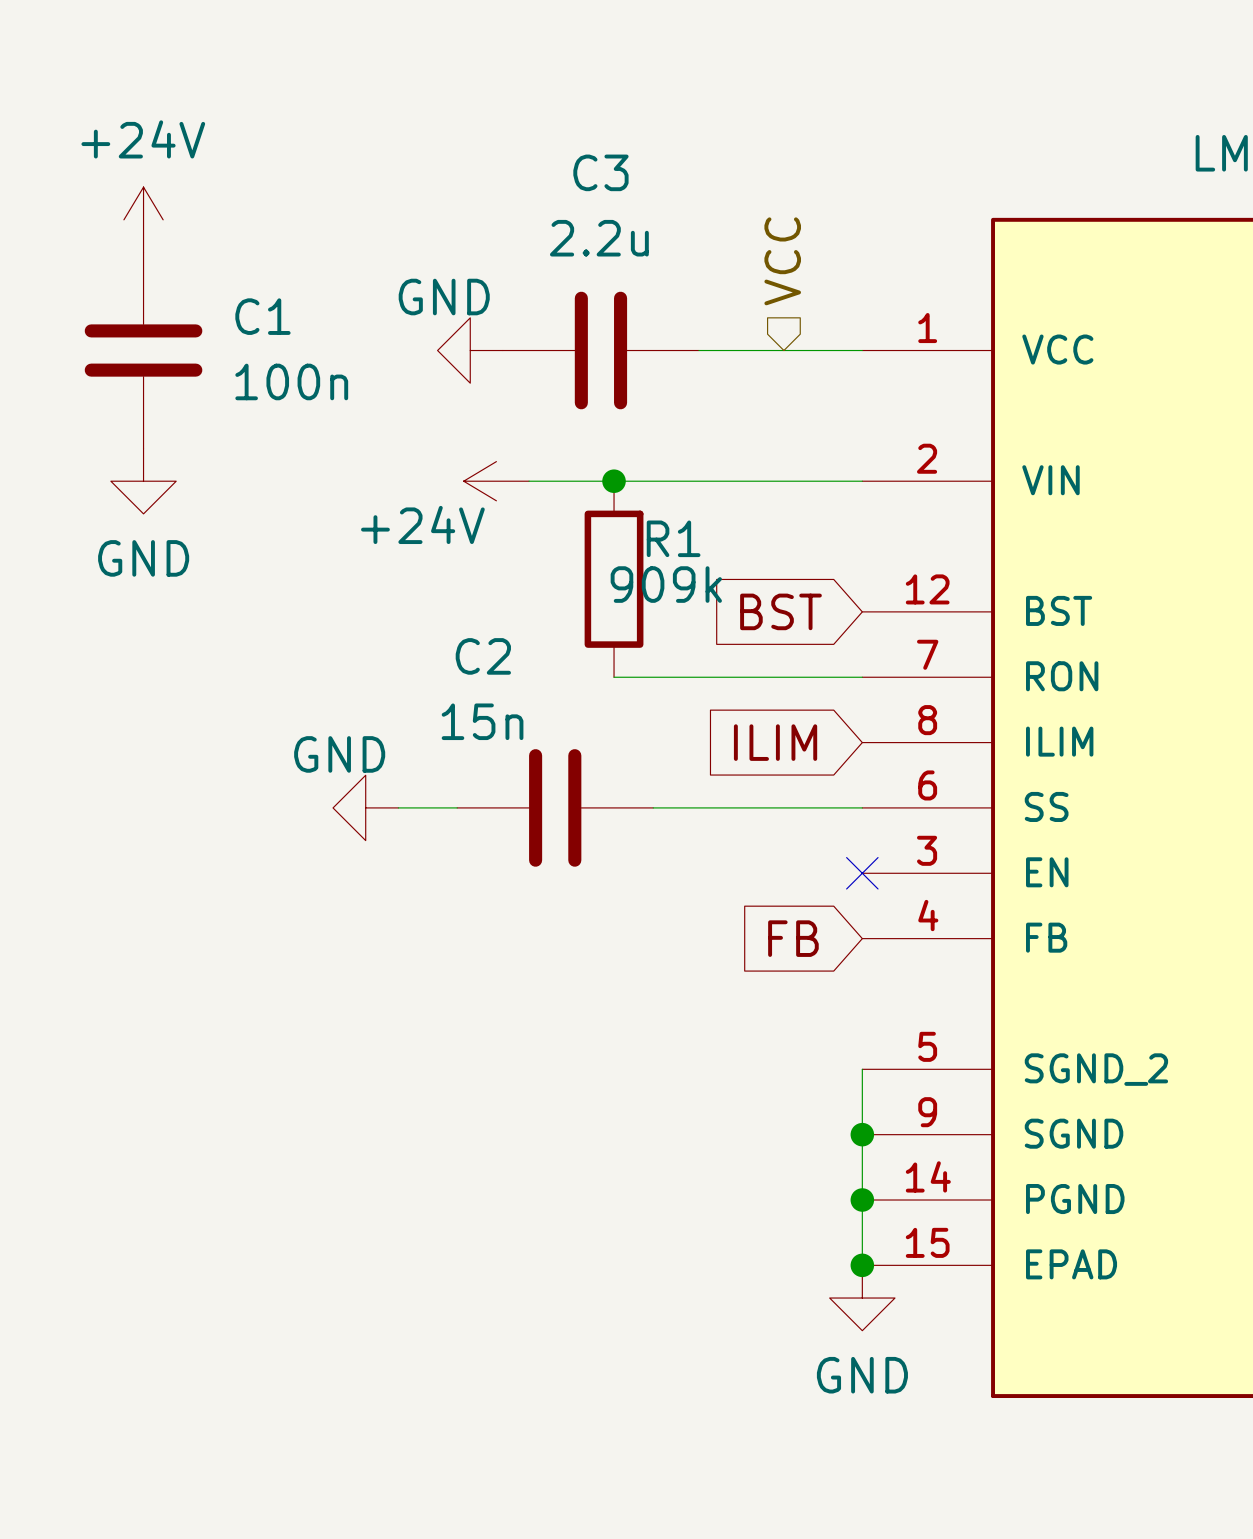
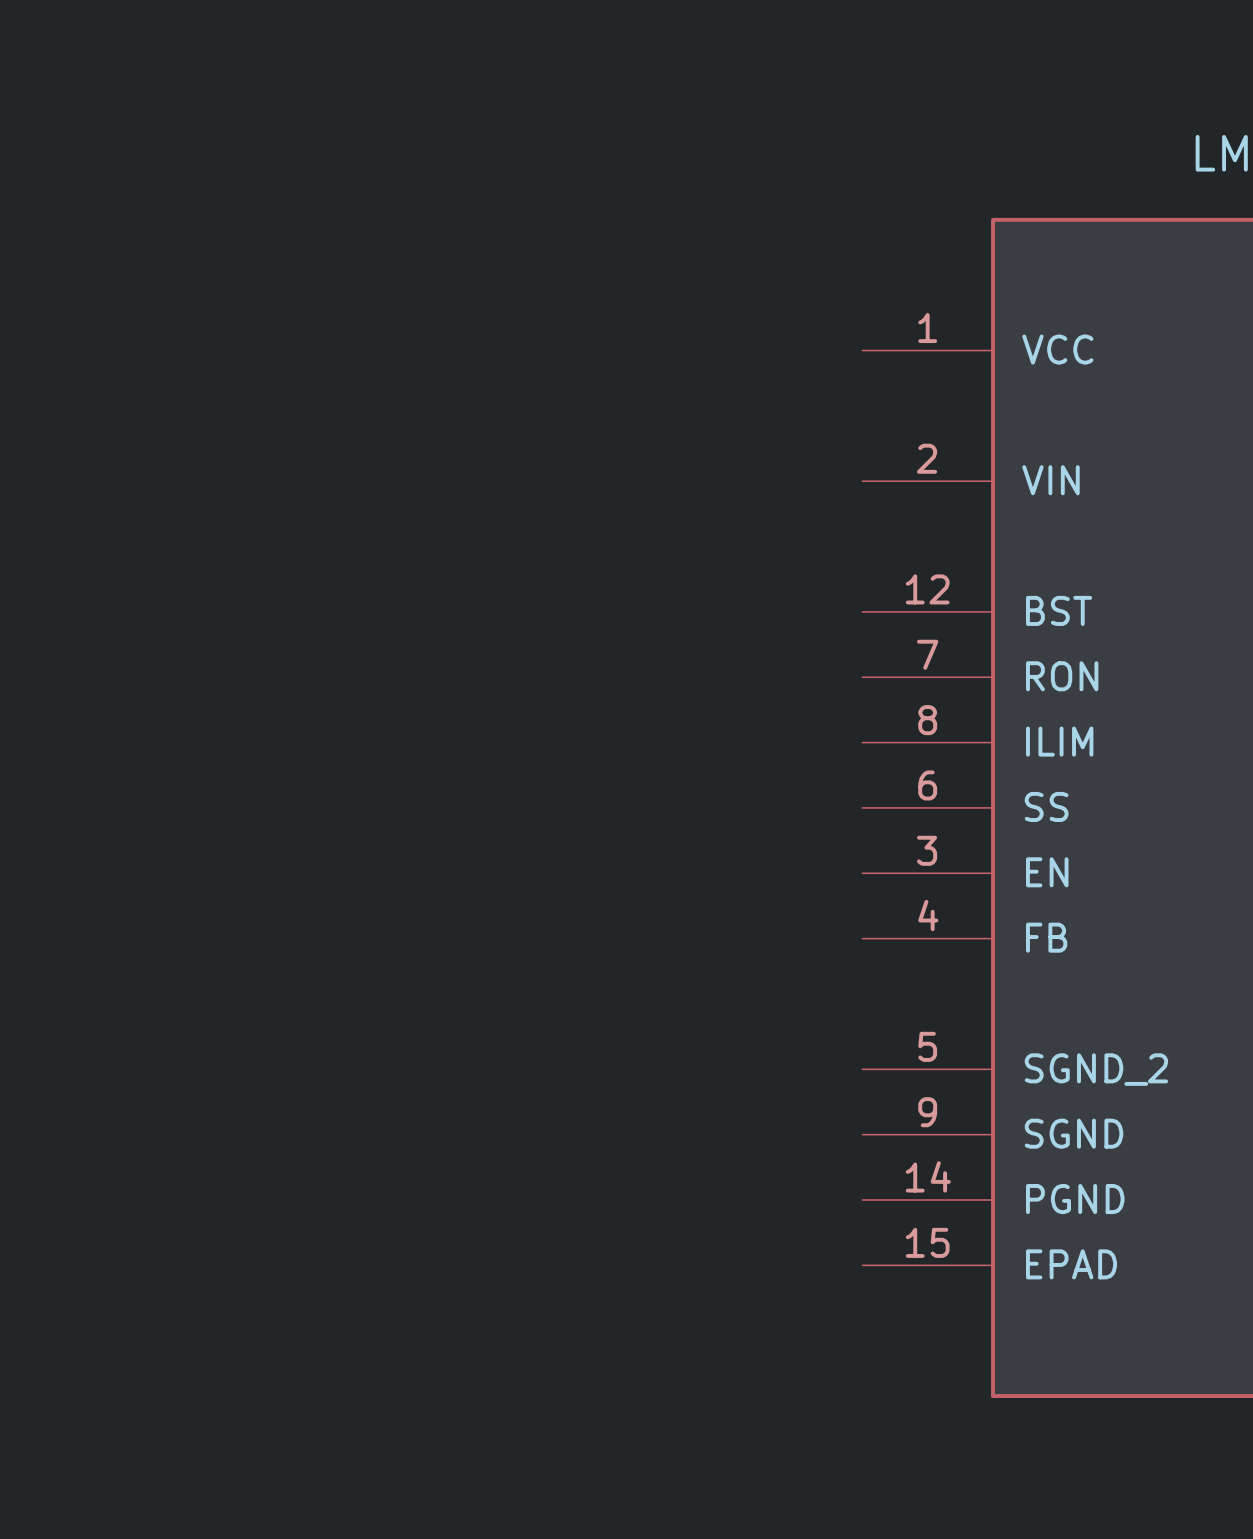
power symbol: +24V (143, 219) -> none
hierarchical label: VCC (782, 261) -> none
C1: 100n (143, 350) -> none
power symbol: GND (470, 350) -> none
C3: 2.2u (600, 350) -> none
wire: (698, 350) (862, 350) -> none
power symbol: GND (143, 481) -> none
power symbol: +24V (496, 481) -> none
wire: (529, 481) (862, 481) -> none
junction: (614, 481) -> none
R1: 909k (614, 579) -> none
global label: BST (780, 611) -> none
wire: (614, 677) (862, 677) -> none
global label: ILIM (775, 742) -> none
power symbol: GND (365, 807) -> none
wire: (398, 807) (457, 807) -> none
C2: 15n (555, 807) -> none
wire: (653, 807) (862, 807) -> none
no-connect mark: (862, 873) -> none
global label: FB (793, 938) -> none
wire: (862, 1069) (862, 1265) -> none
junction: (862, 1134) -> none
junction: (862, 1200) -> none
junction: (862, 1265) -> none
power symbol: GND (862, 1298) -> none

